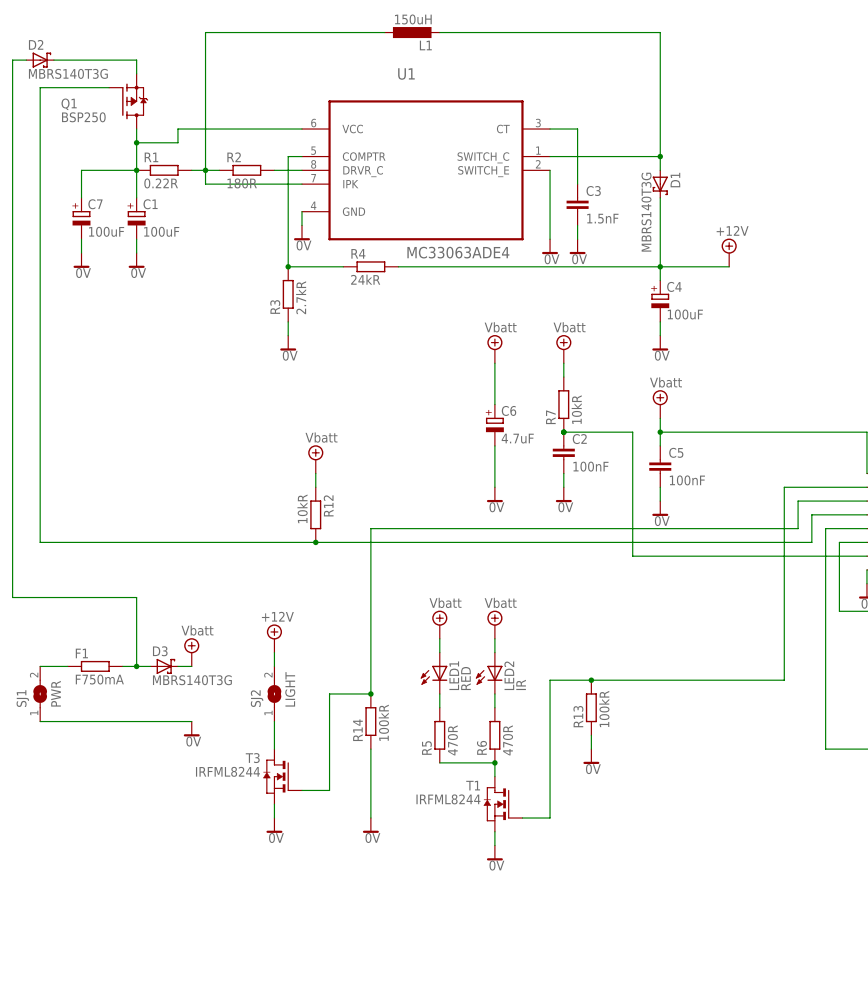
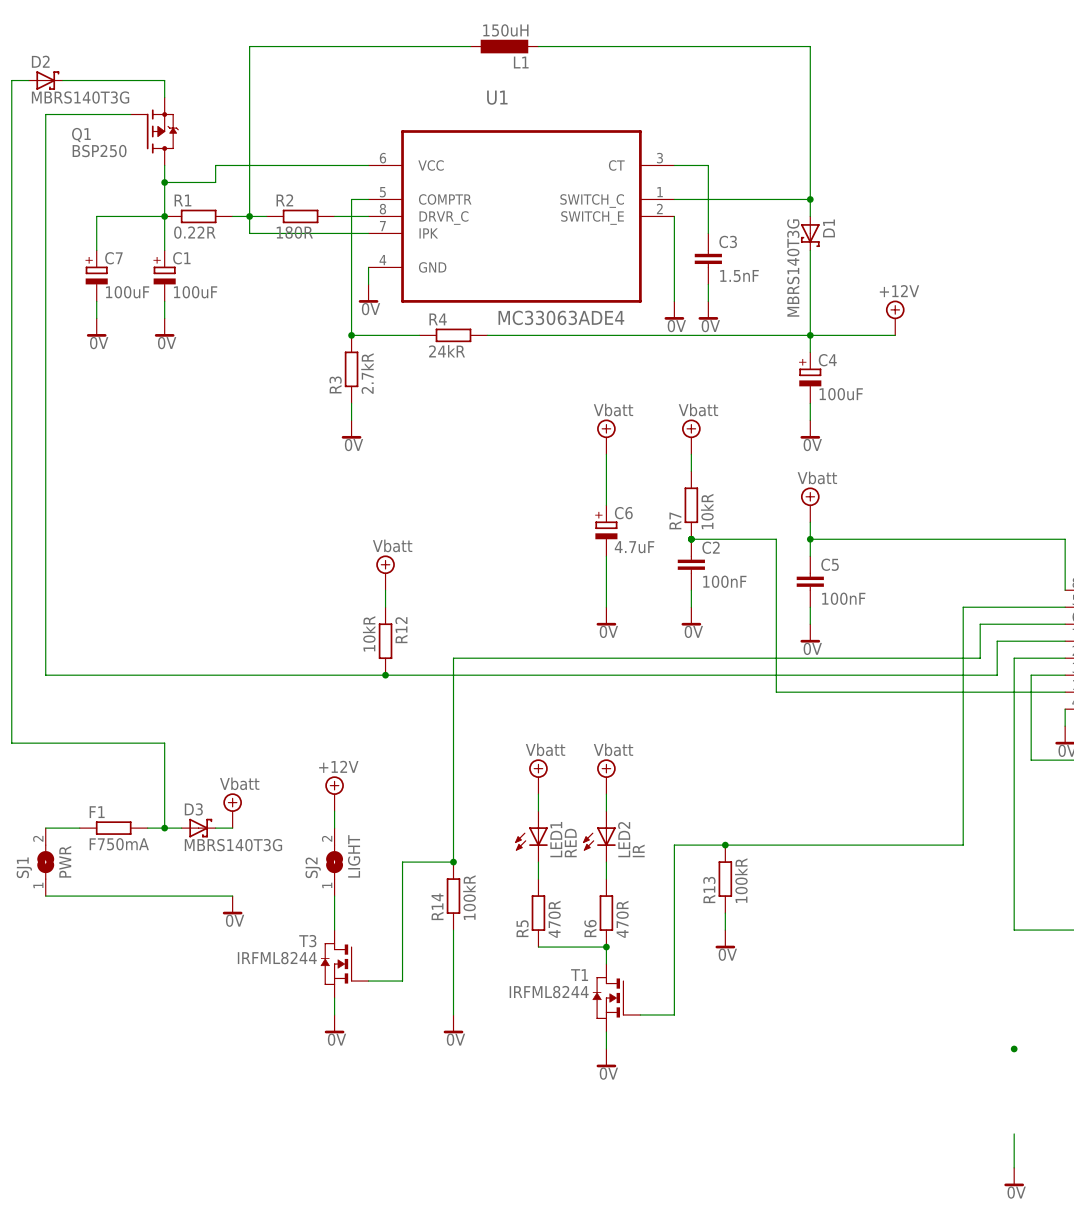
junction: none -> (1014, 1048)
wire: none -> (1014, 1133) (1014, 1167)
power symbol: none -> 0V (1014, 1177)

